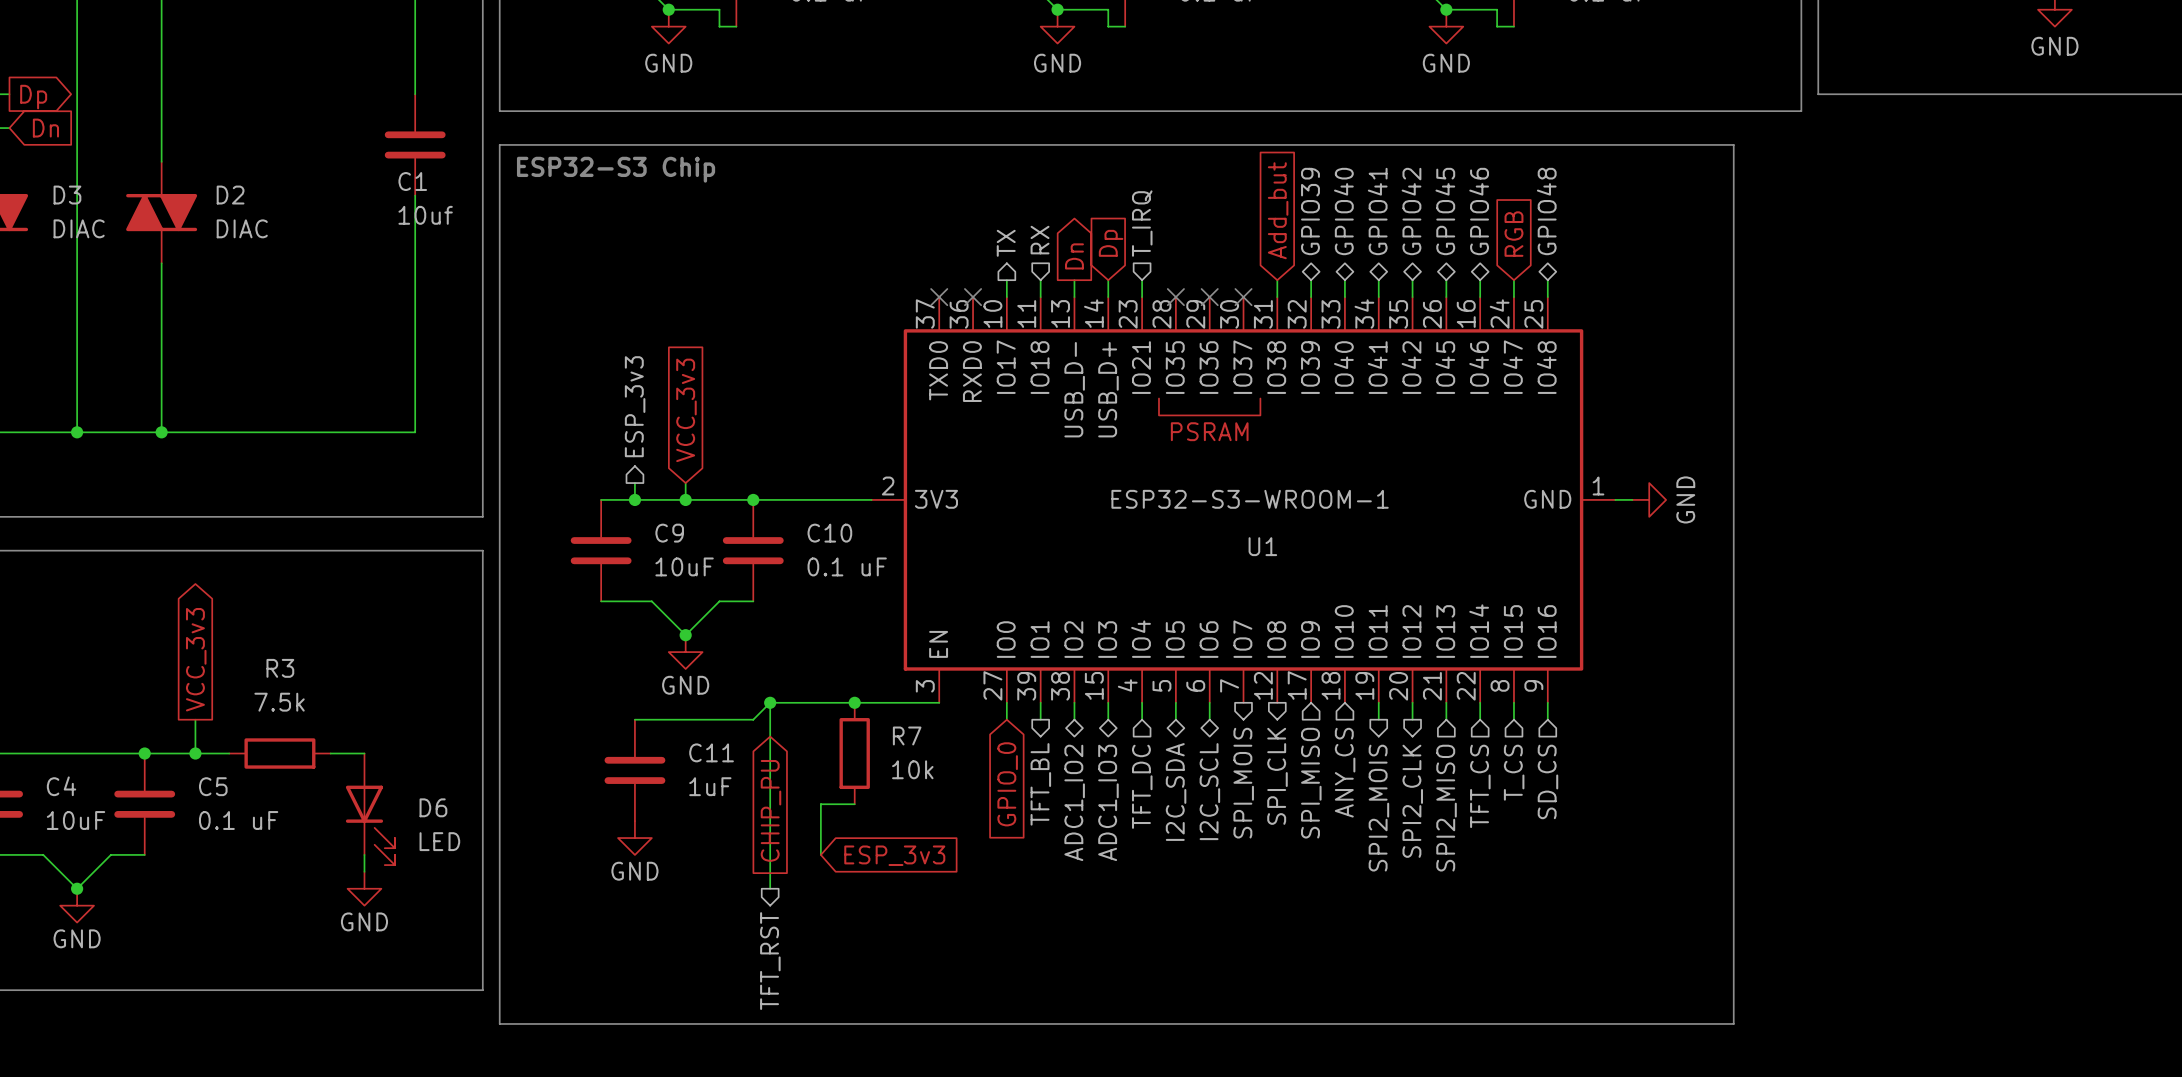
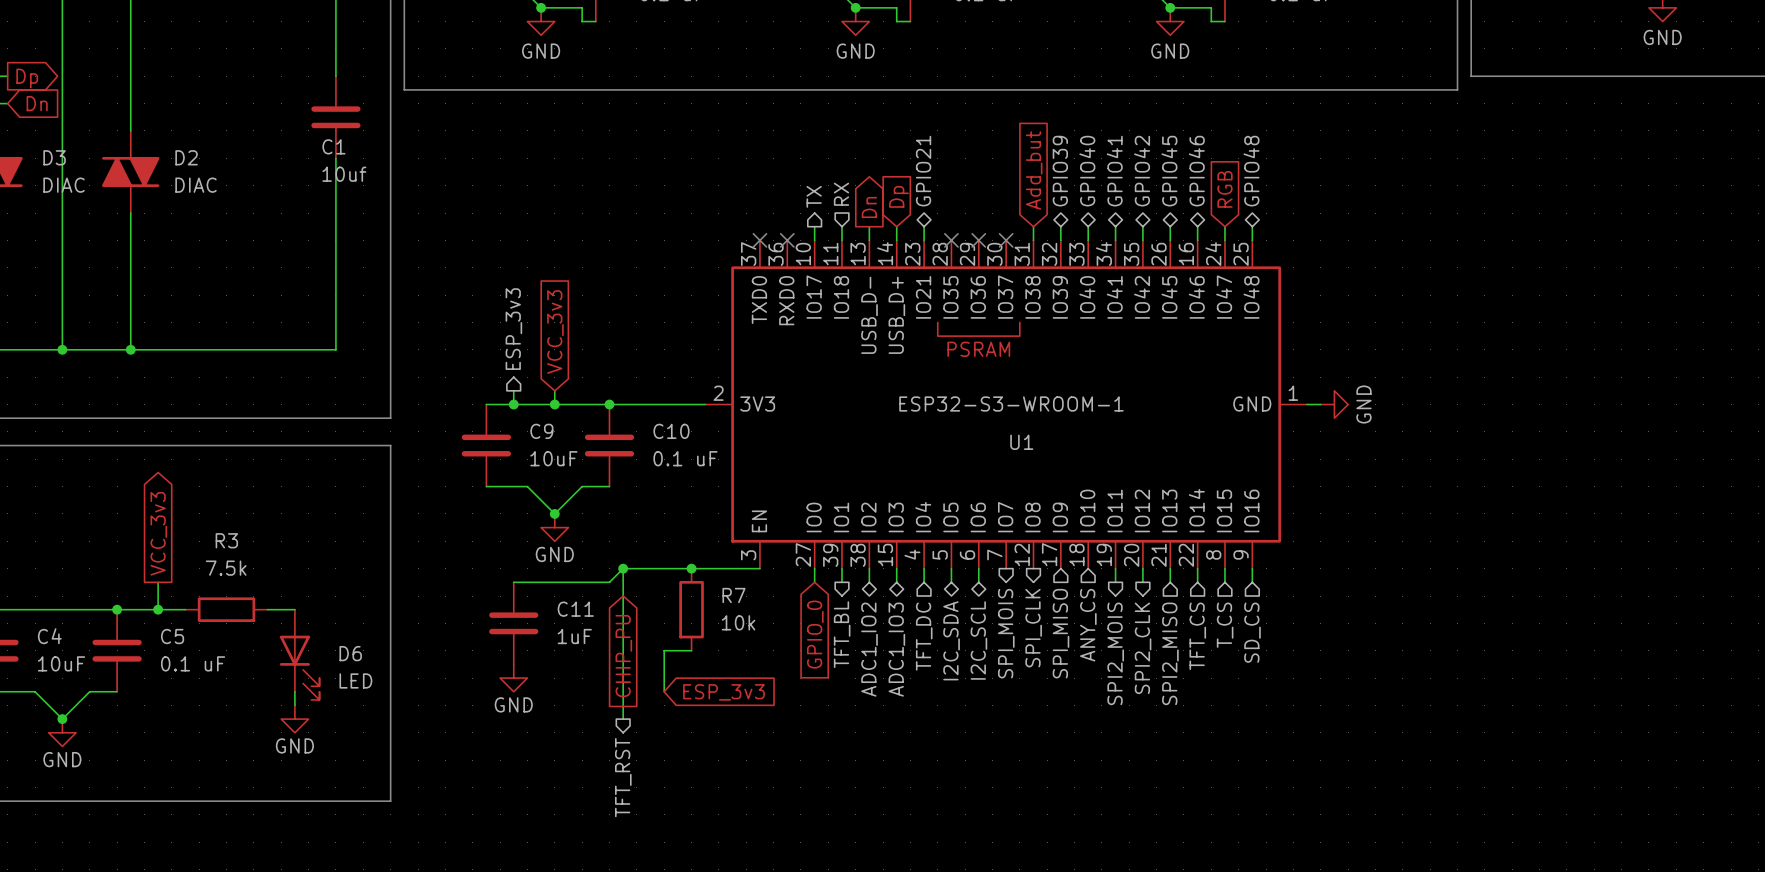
line: (499, 144) (1733, 144) (1733, 1023) (499, 1023) (499, 144) -> none
text: ESP32-S3 Chip (616, 169) -> none
hierarchical label shape: input (1142, 223) -> bidirectional (923, 171)
hierarchical label: T_IRQ (1142, 223) -> GPIO21 (923, 171)

